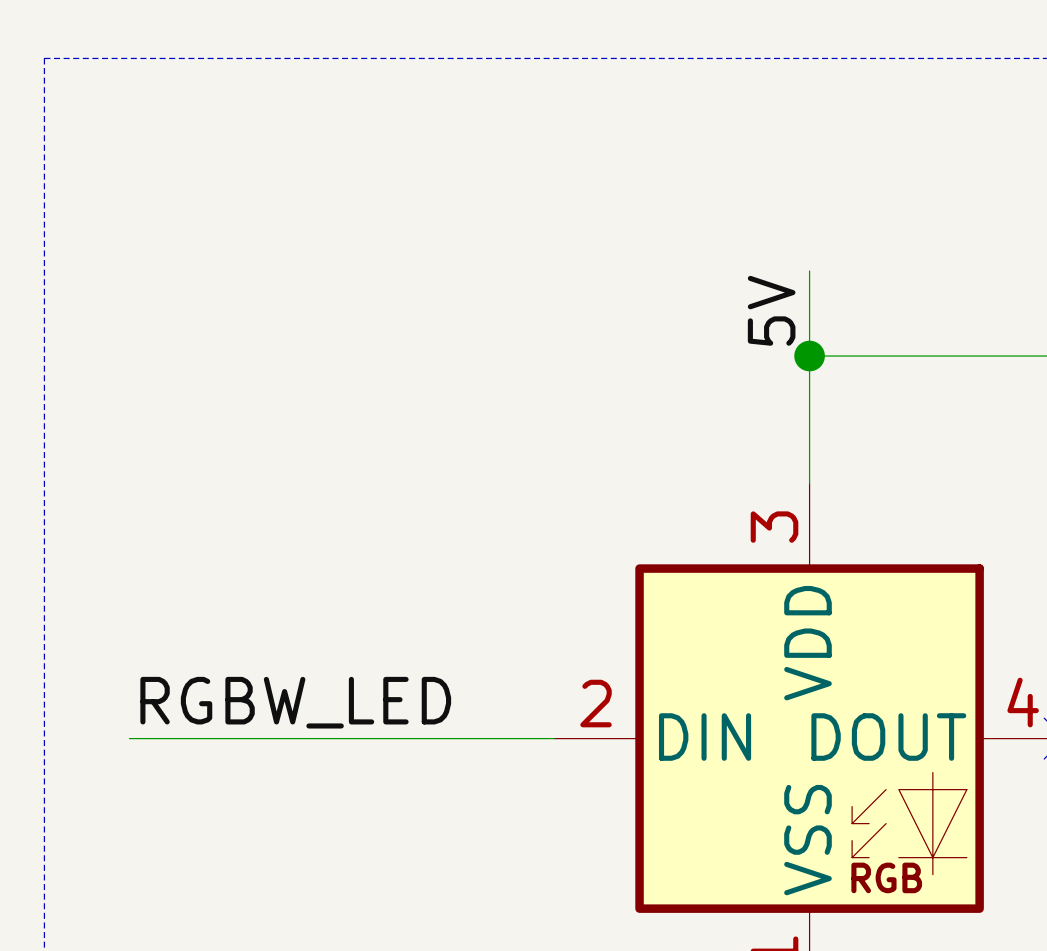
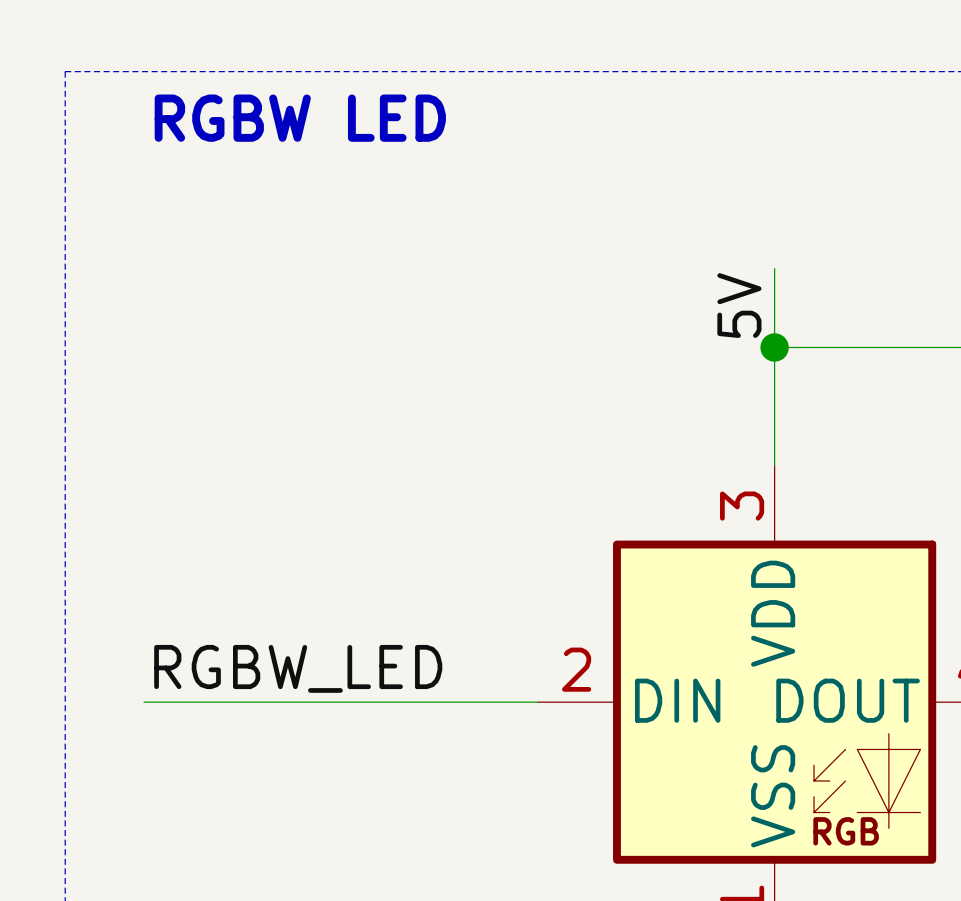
text: none -> RGBW LED (300, 118)

